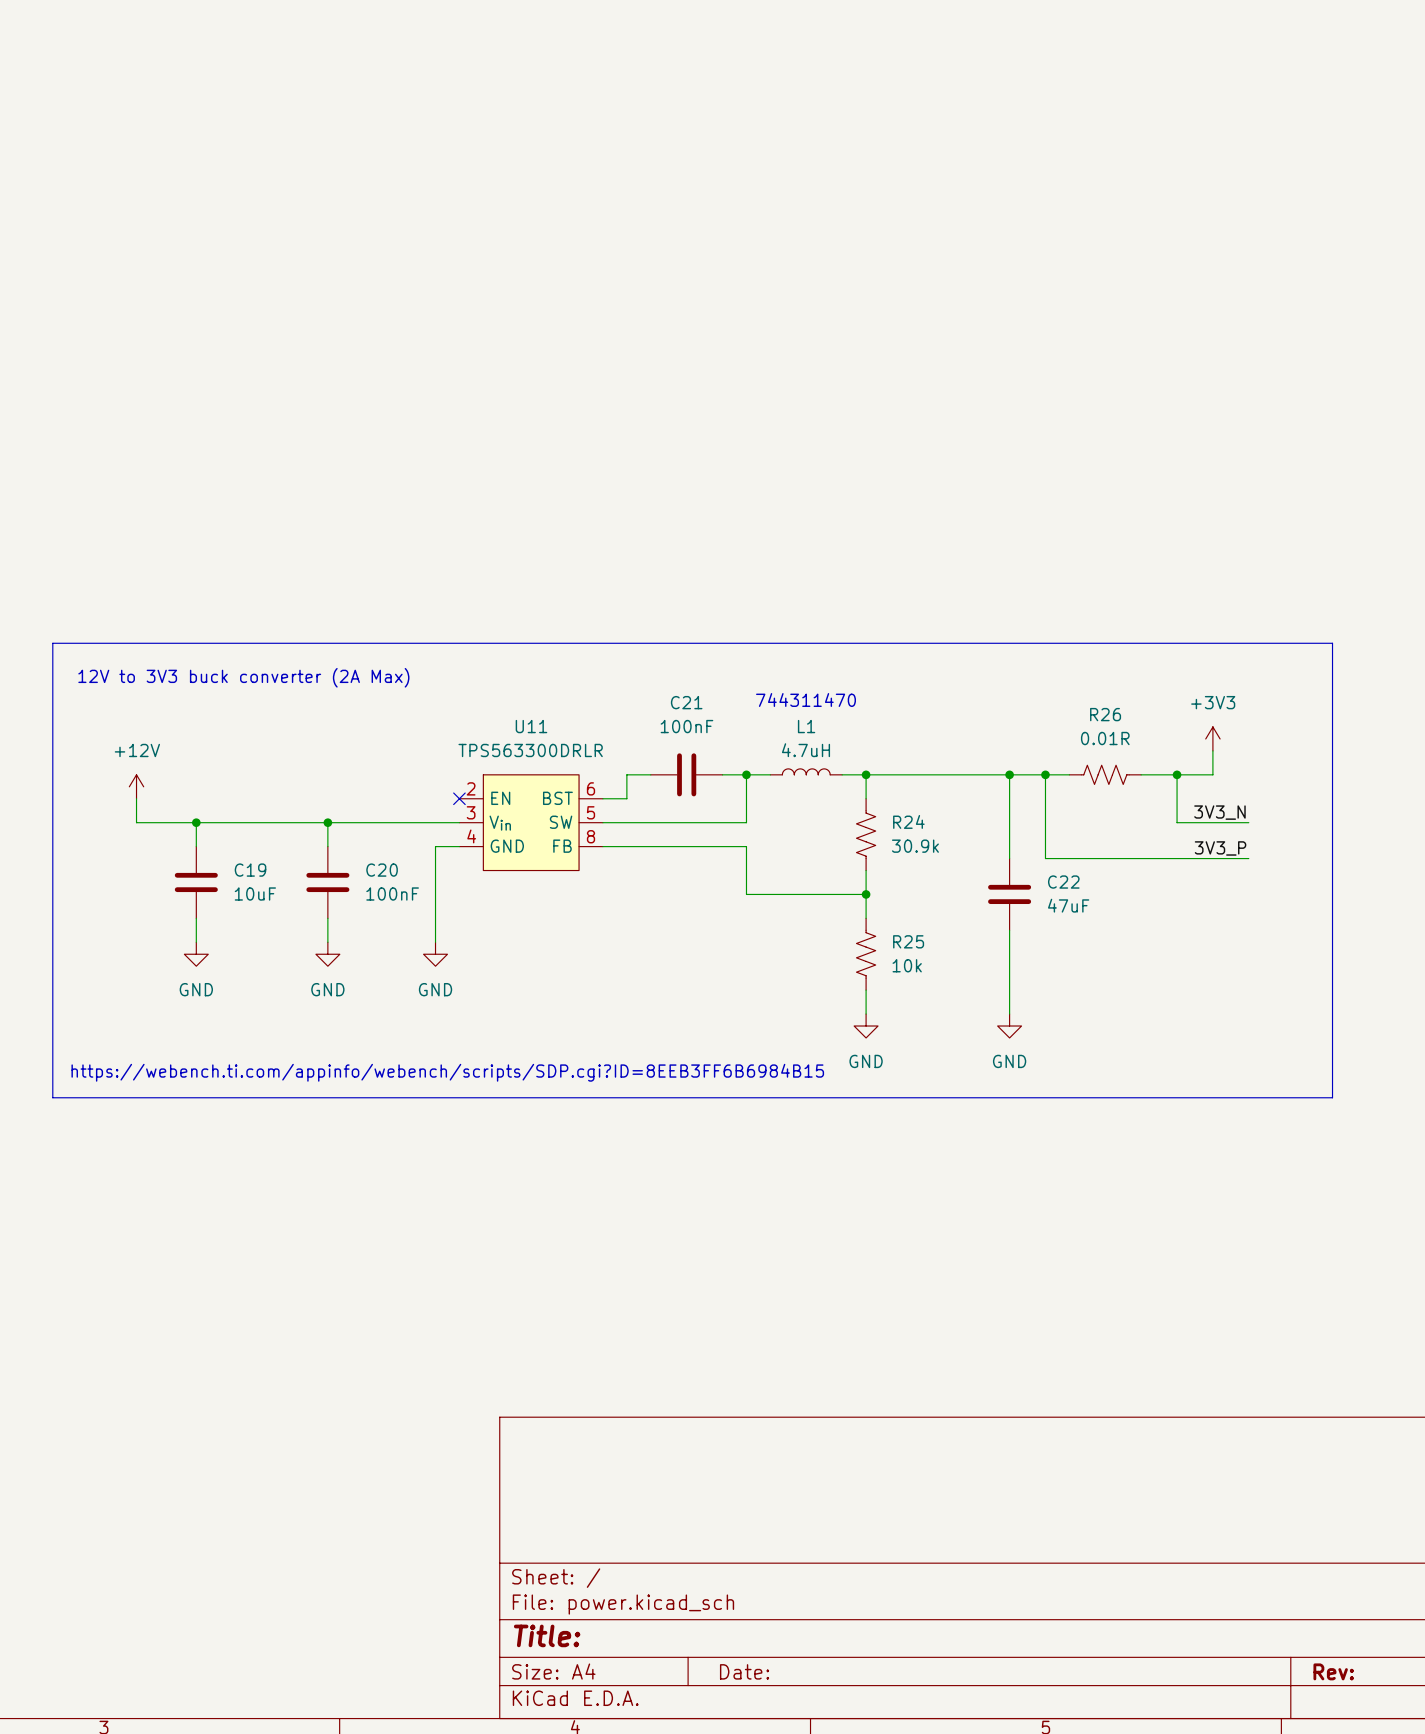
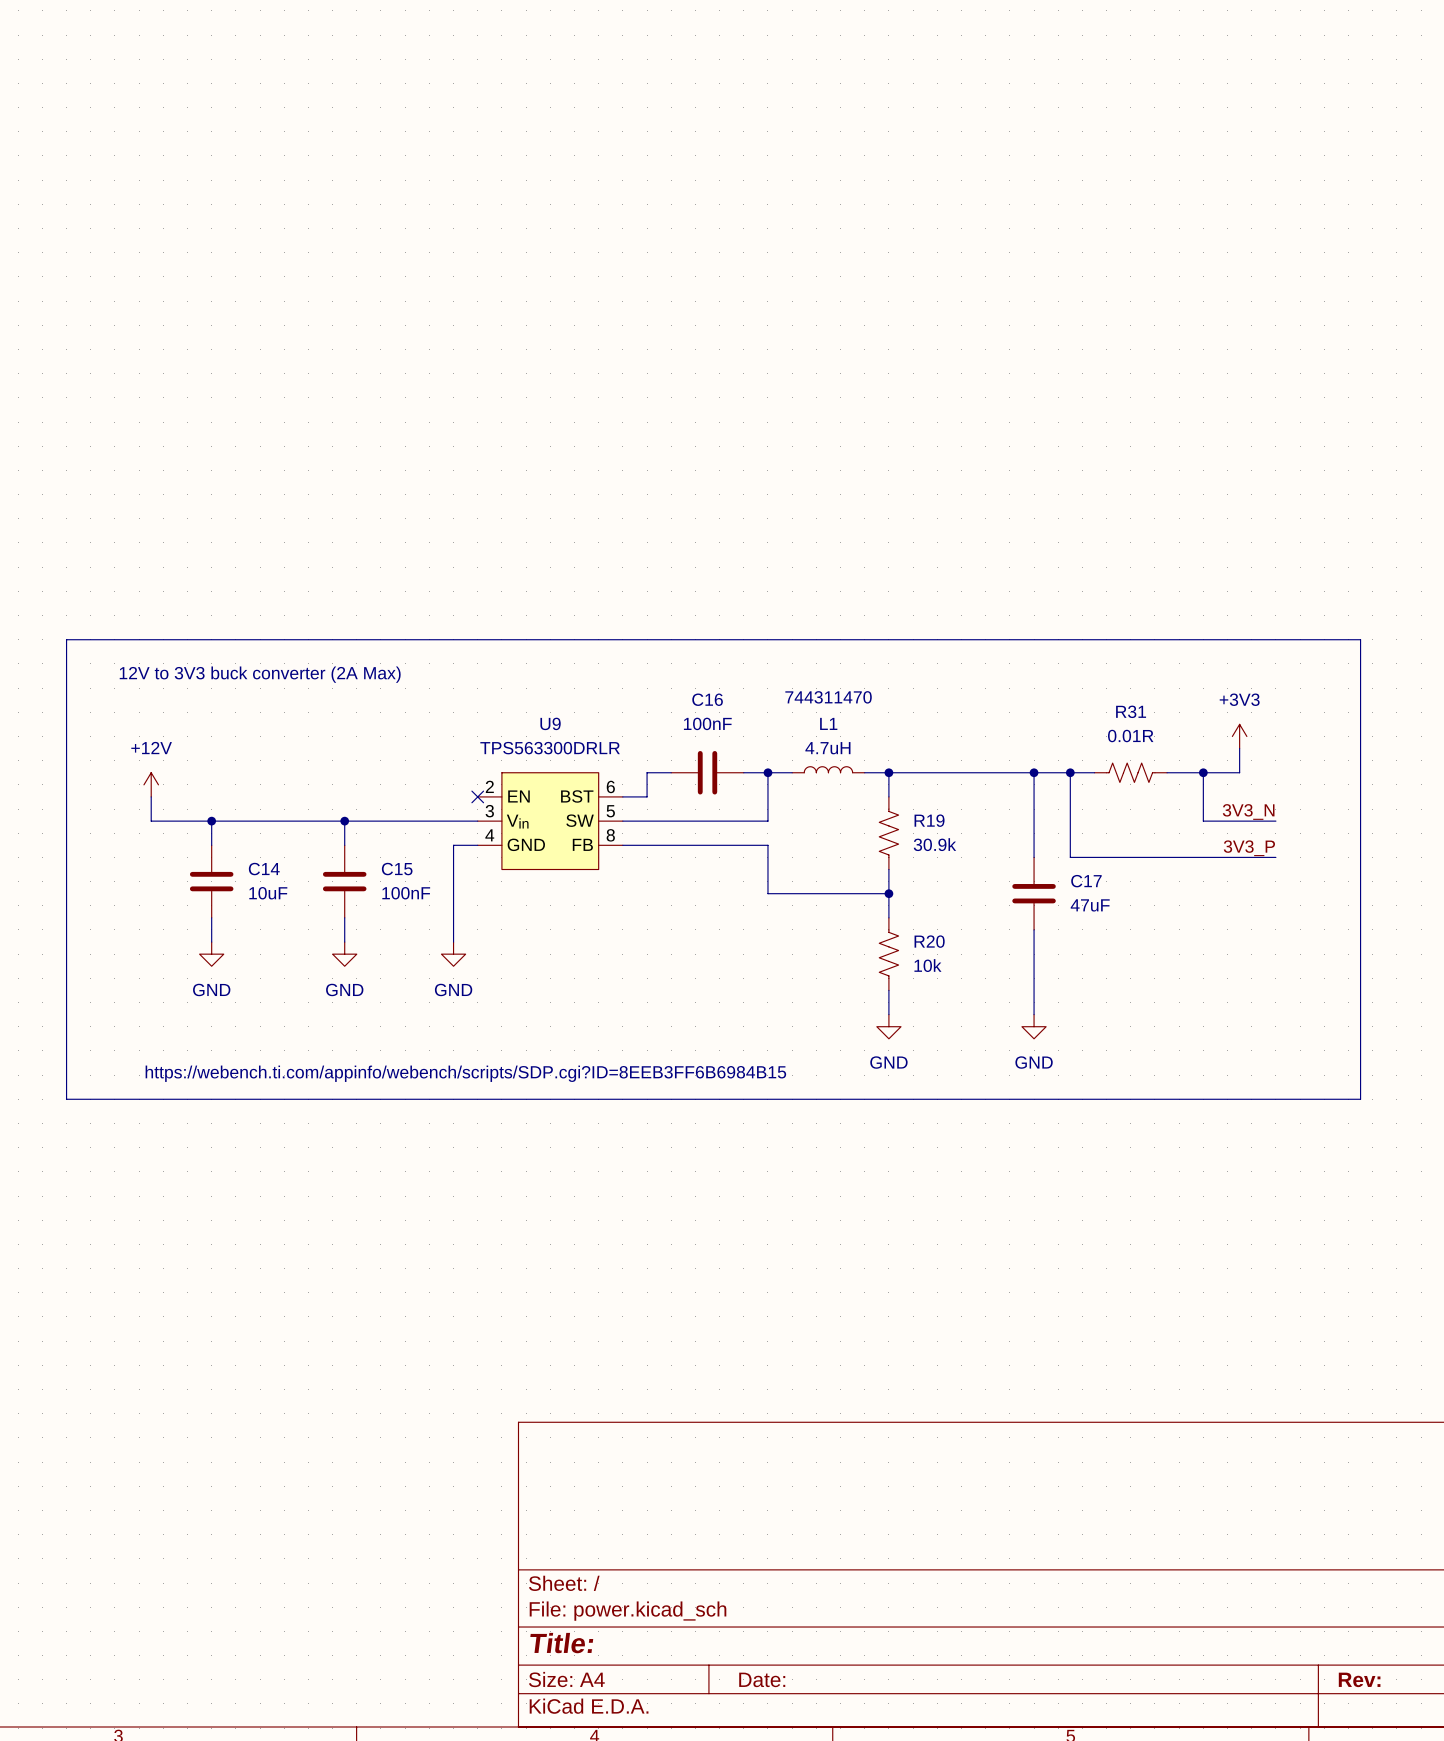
C21 name: C21 (686, 702) -> C16 (707, 699)
R26 name: R26 (1105, 714) -> R31 (1131, 711)
U11 name: U11 (531, 726) -> U9 (550, 723)
R24 name: R24 (908, 821) -> R19 (929, 820)
C19 name: C19 (250, 870) -> C14 (264, 869)
C20 name: C20 (382, 870) -> C15 (397, 869)
C22 name: C22 (1063, 882) -> C17 (1086, 881)
R25 name: R25 (908, 941) -> R20 (929, 941)

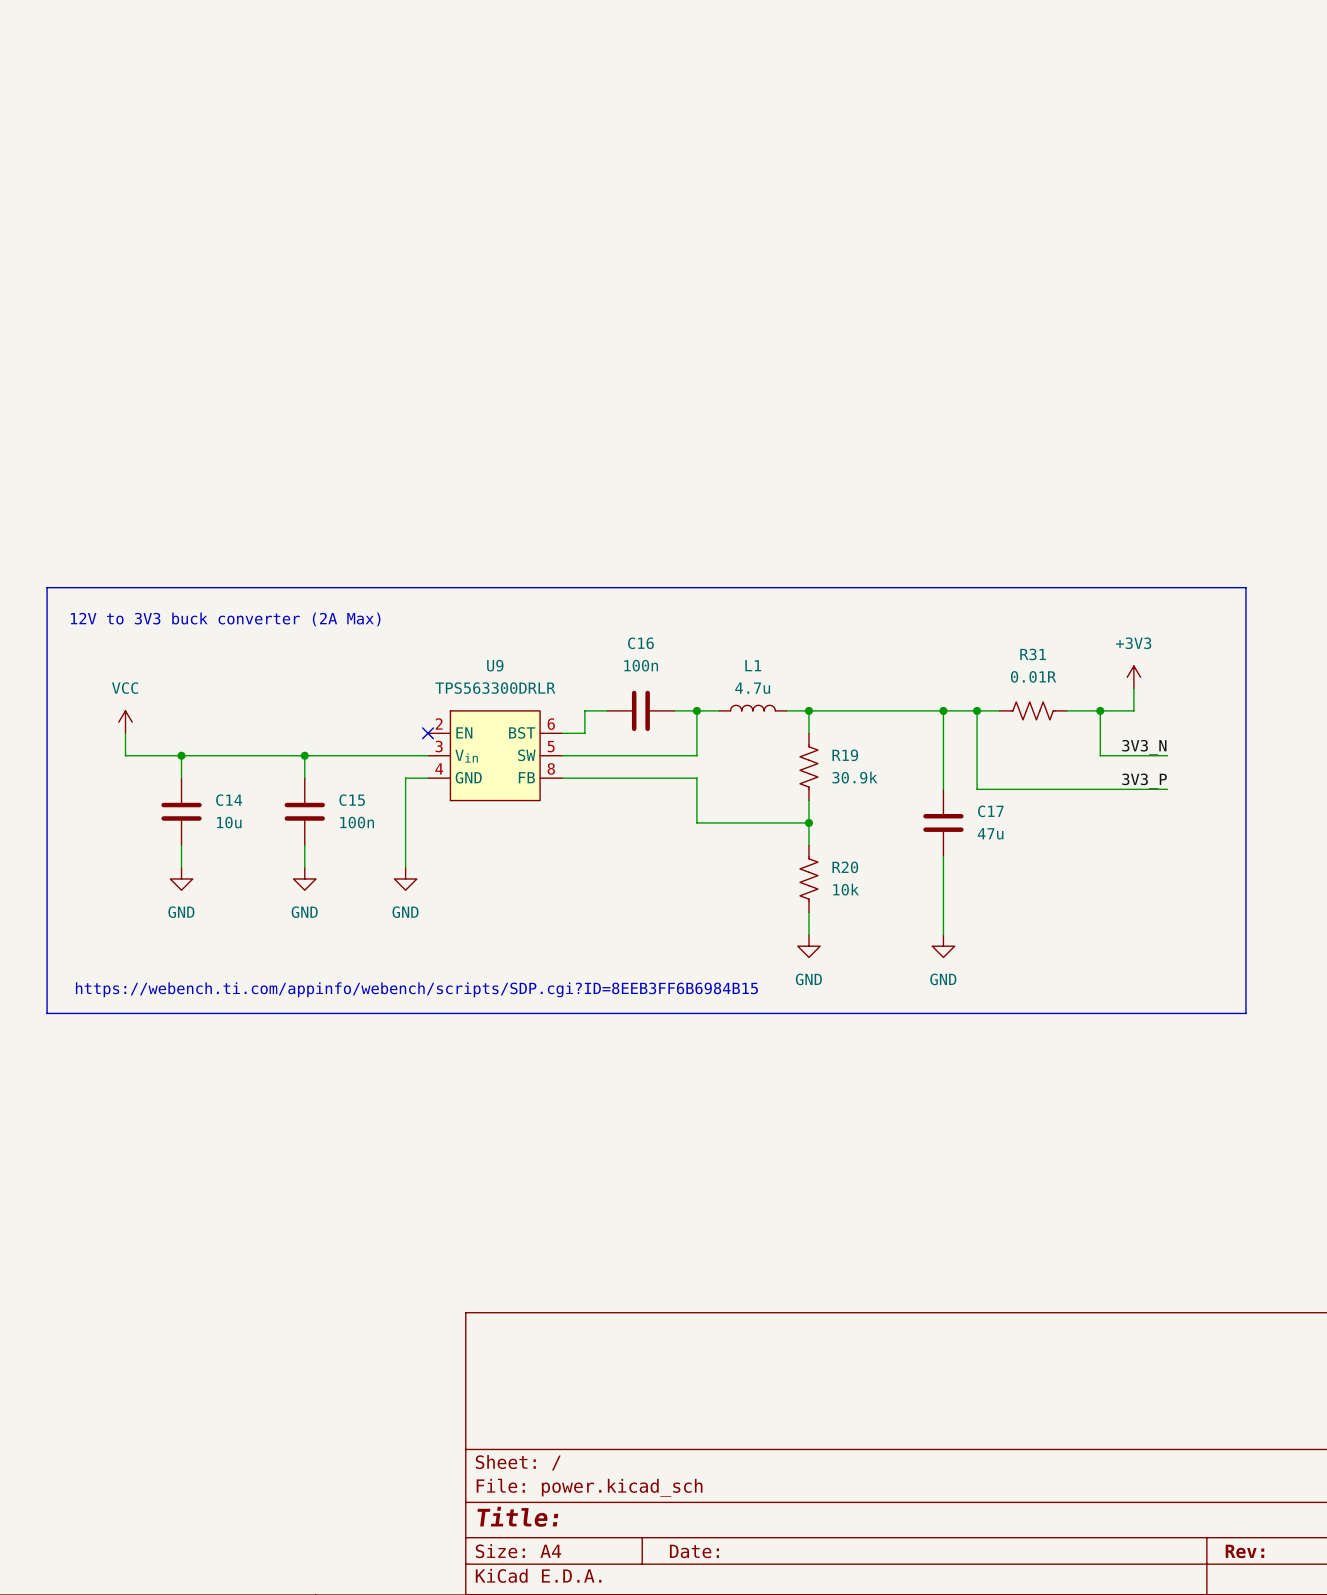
text: 744311470 (828, 697) -> none
C16 value: 100nF (707, 723) -> 100n (641, 665)
L1 value: 4.7uH (827, 748) -> 4.7u (752, 688)
power symbol: +12V (151, 784) -> VCC (125, 722)
C14 value: 10uF (268, 893) -> 10u (229, 822)
C15 value: 100nF (406, 893) -> 100n (357, 822)
C17 value: 47uF (1090, 905) -> 47u (990, 833)

